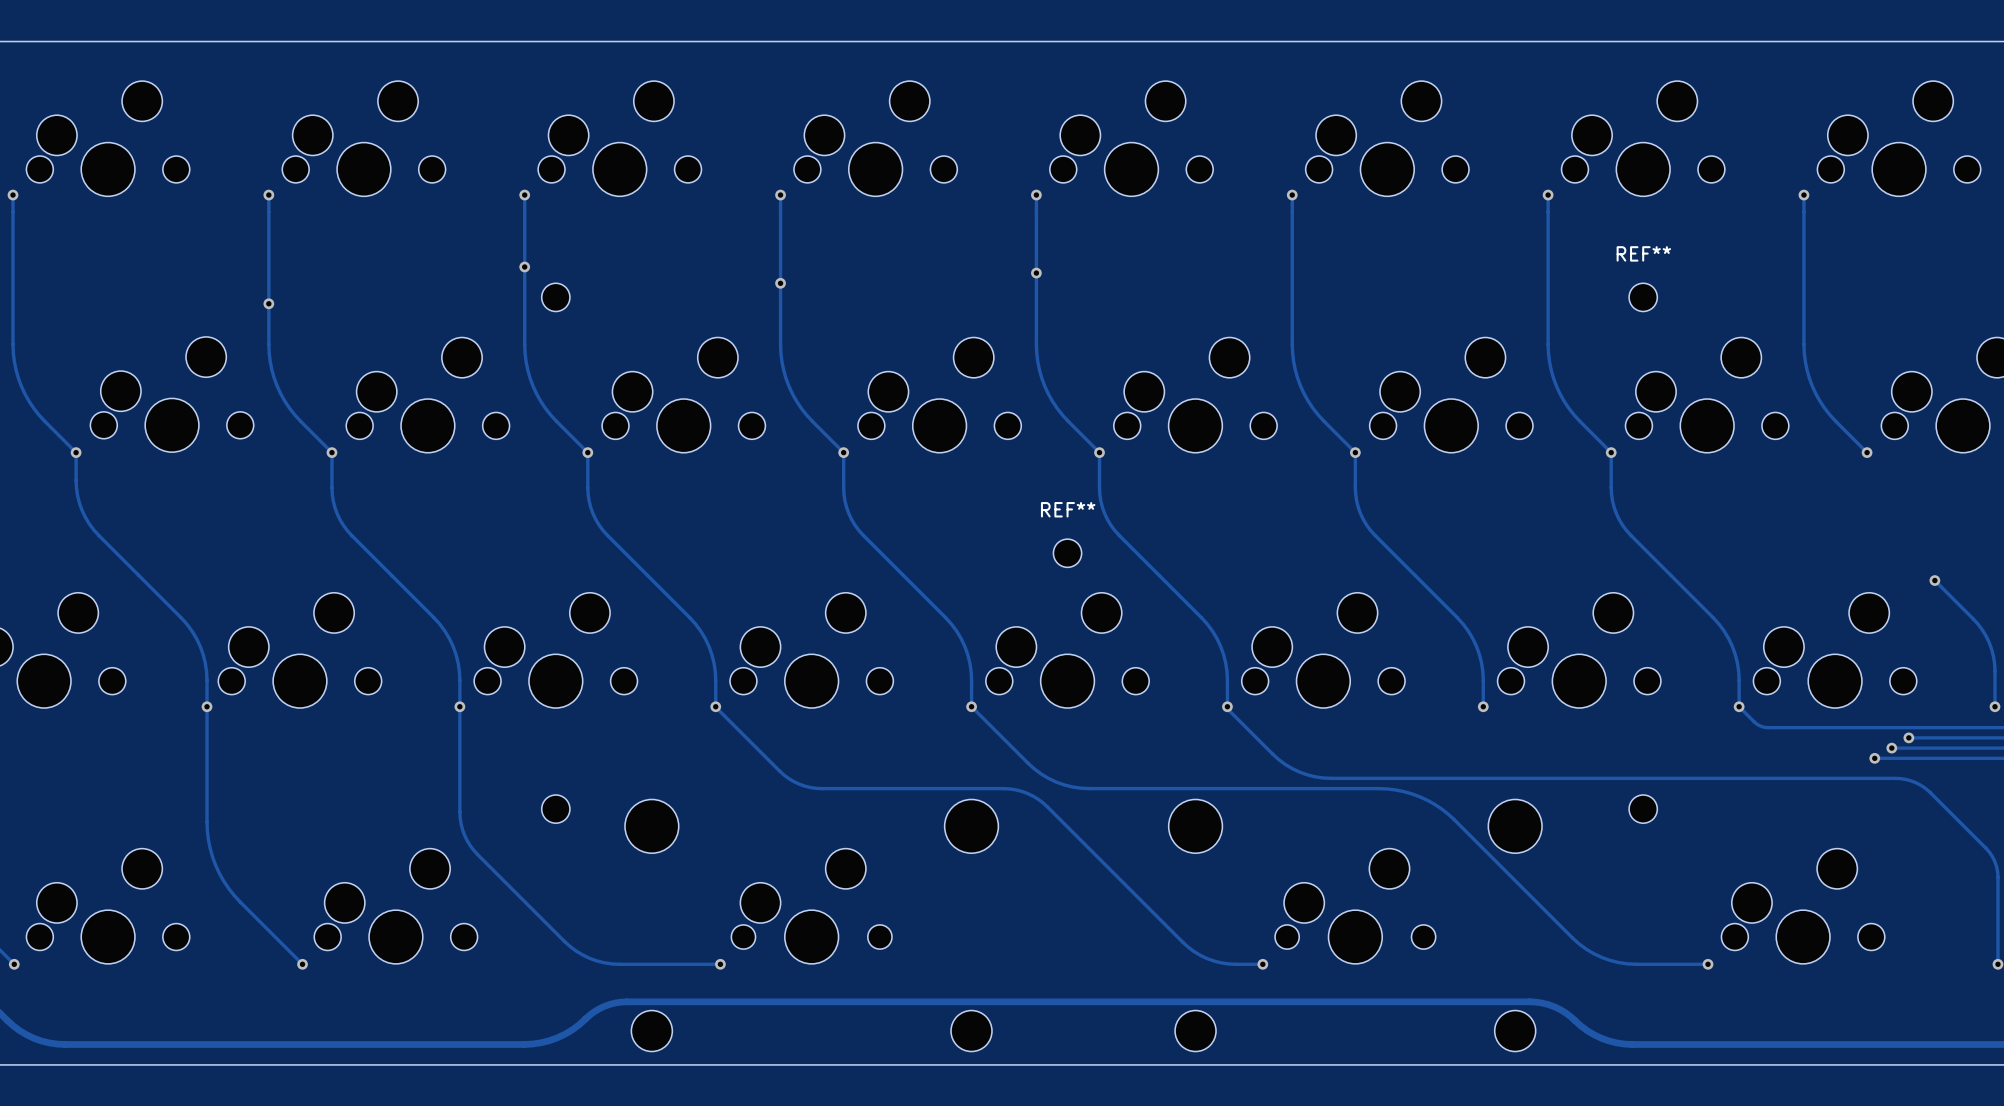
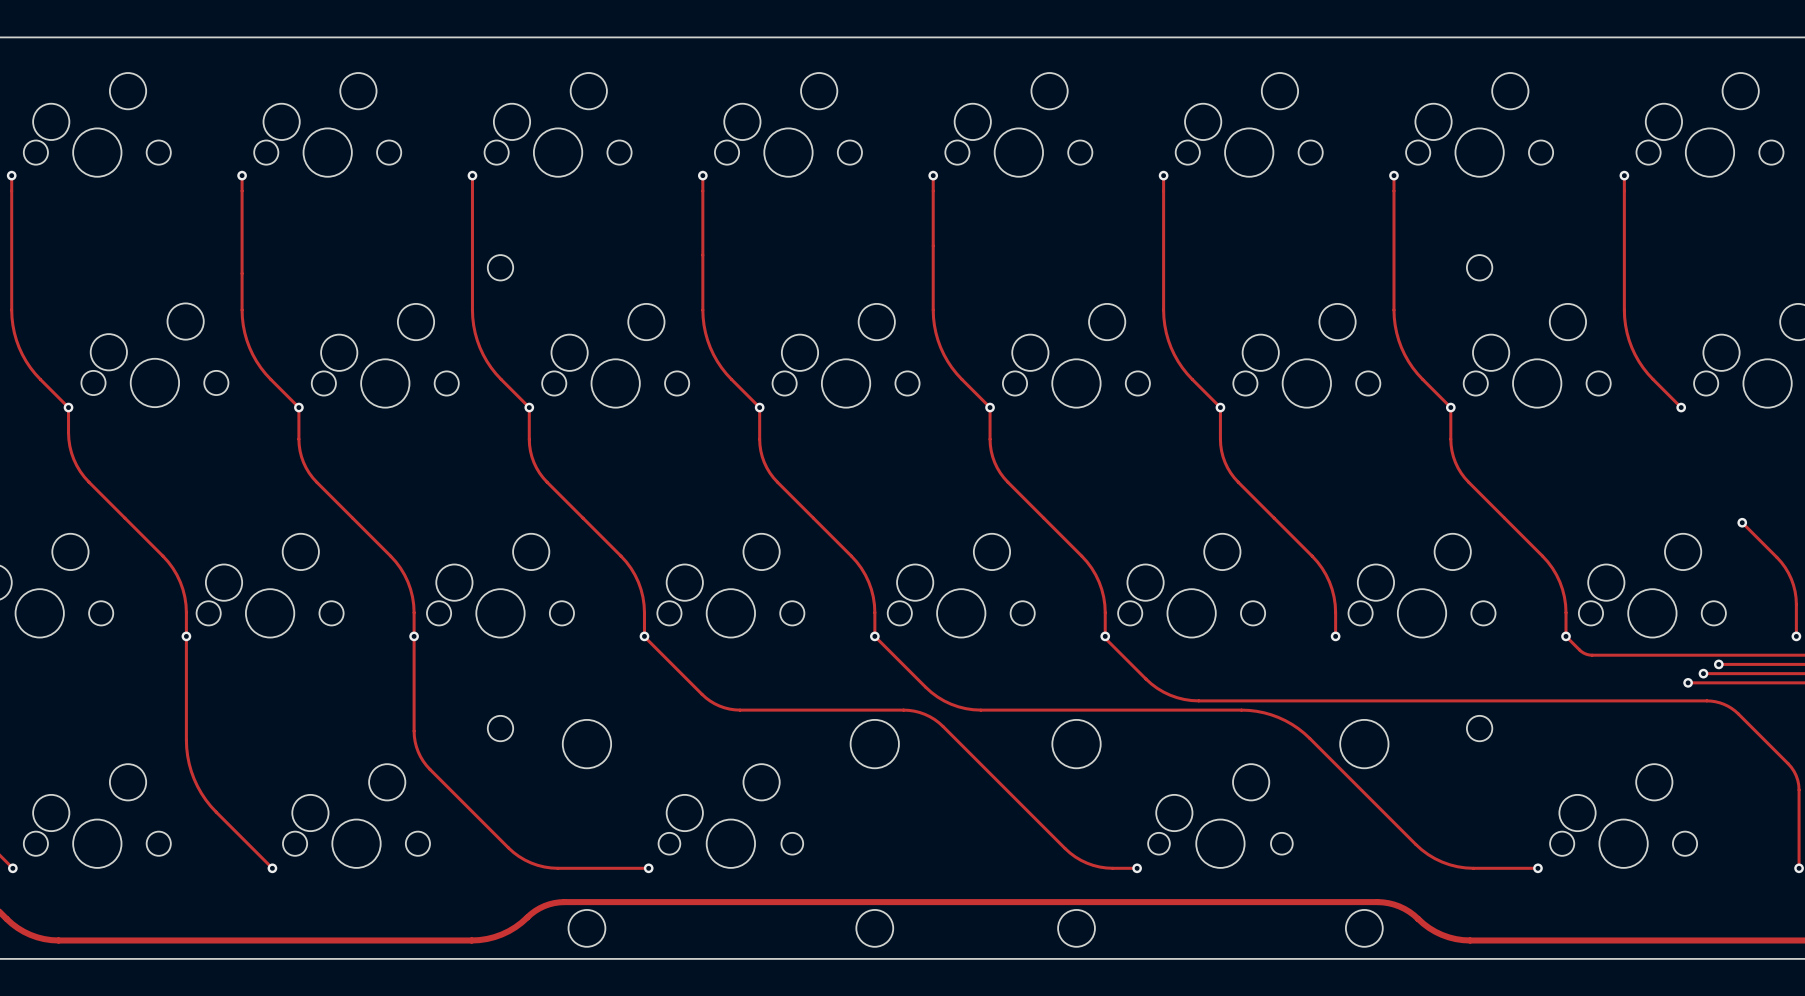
REF** name: REF** (1643, 253) -> none
via: (524, 266) -> none
via: (1036, 273) -> none
via: (780, 283) -> none
via: (268, 303) -> none
REF**: (1067, 553) -> none

